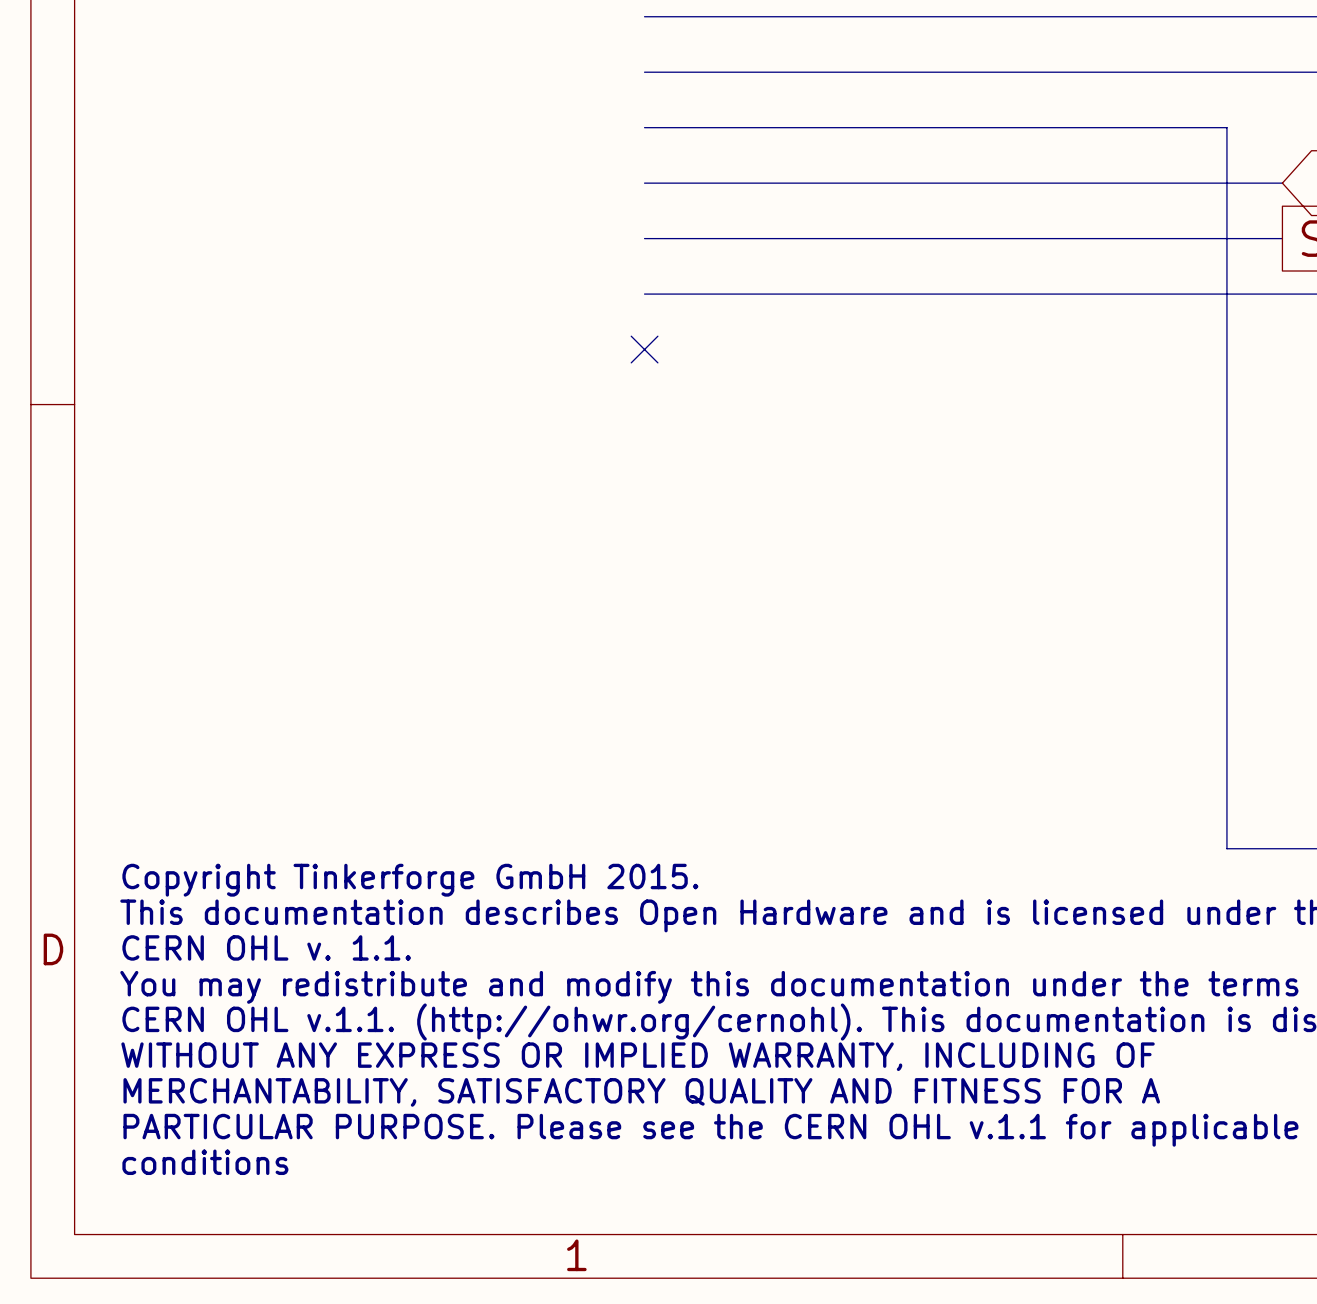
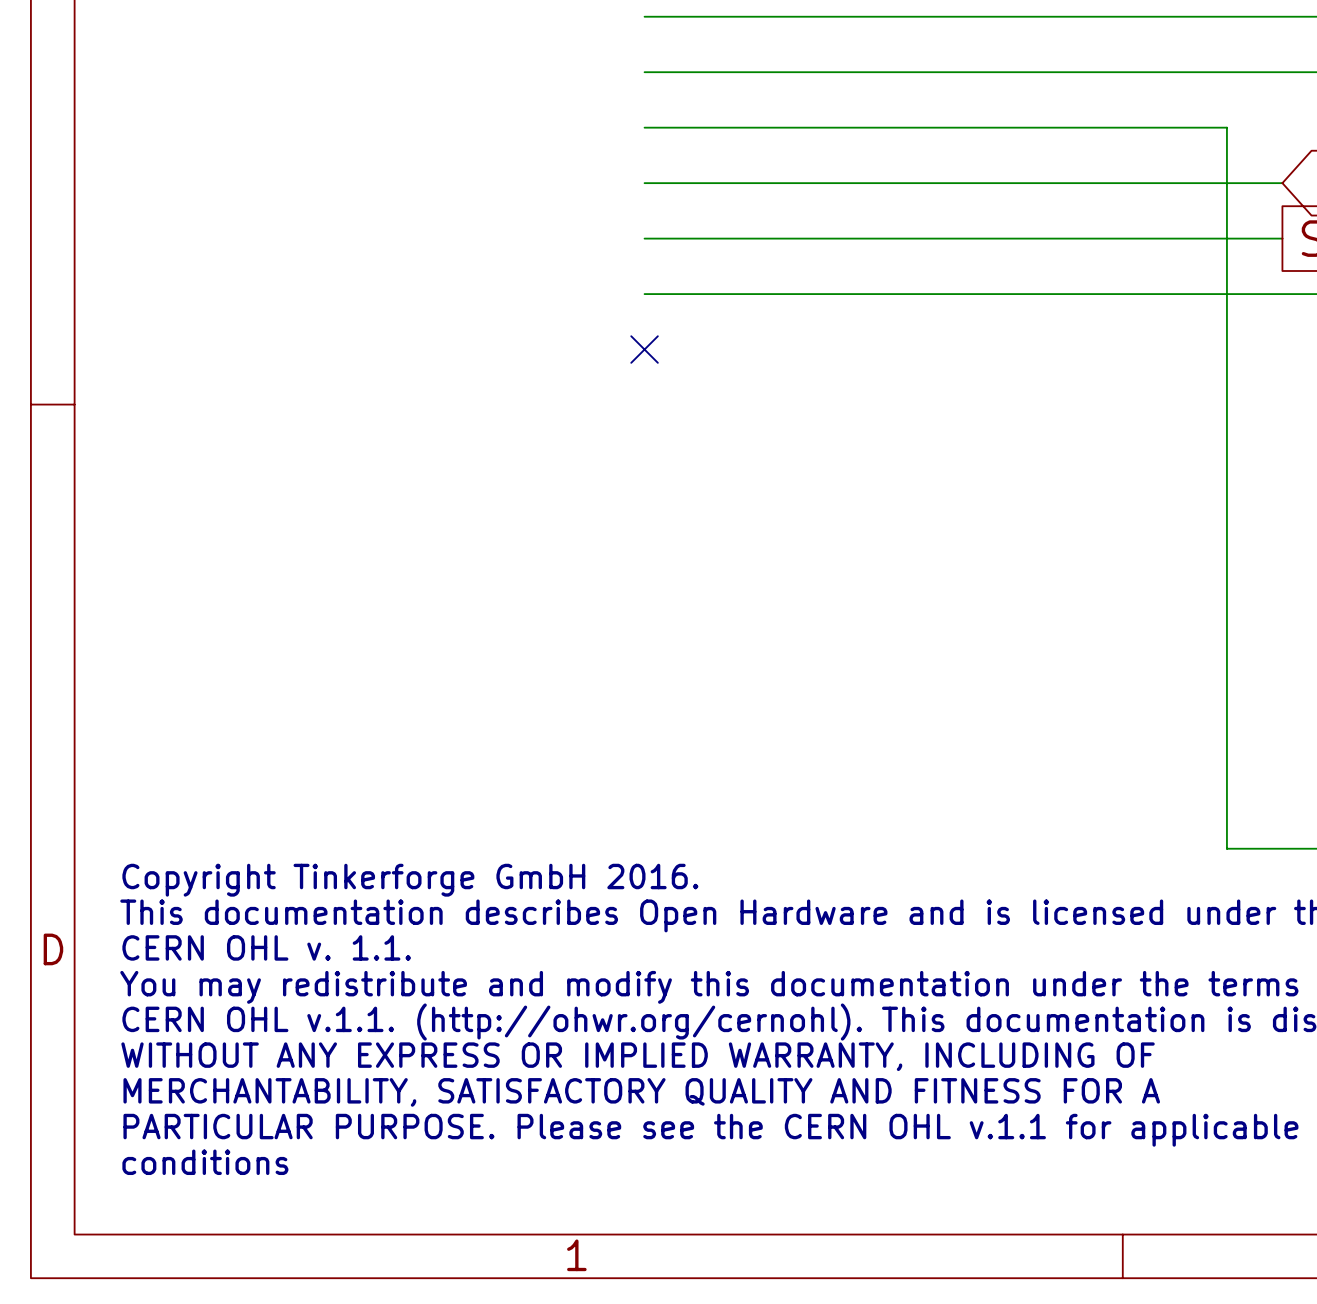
text: Copyright Tinkerforge GmbH 2015. (410, 880) -> Copyright Tinkerforge GmbH 2016. (410, 880)

